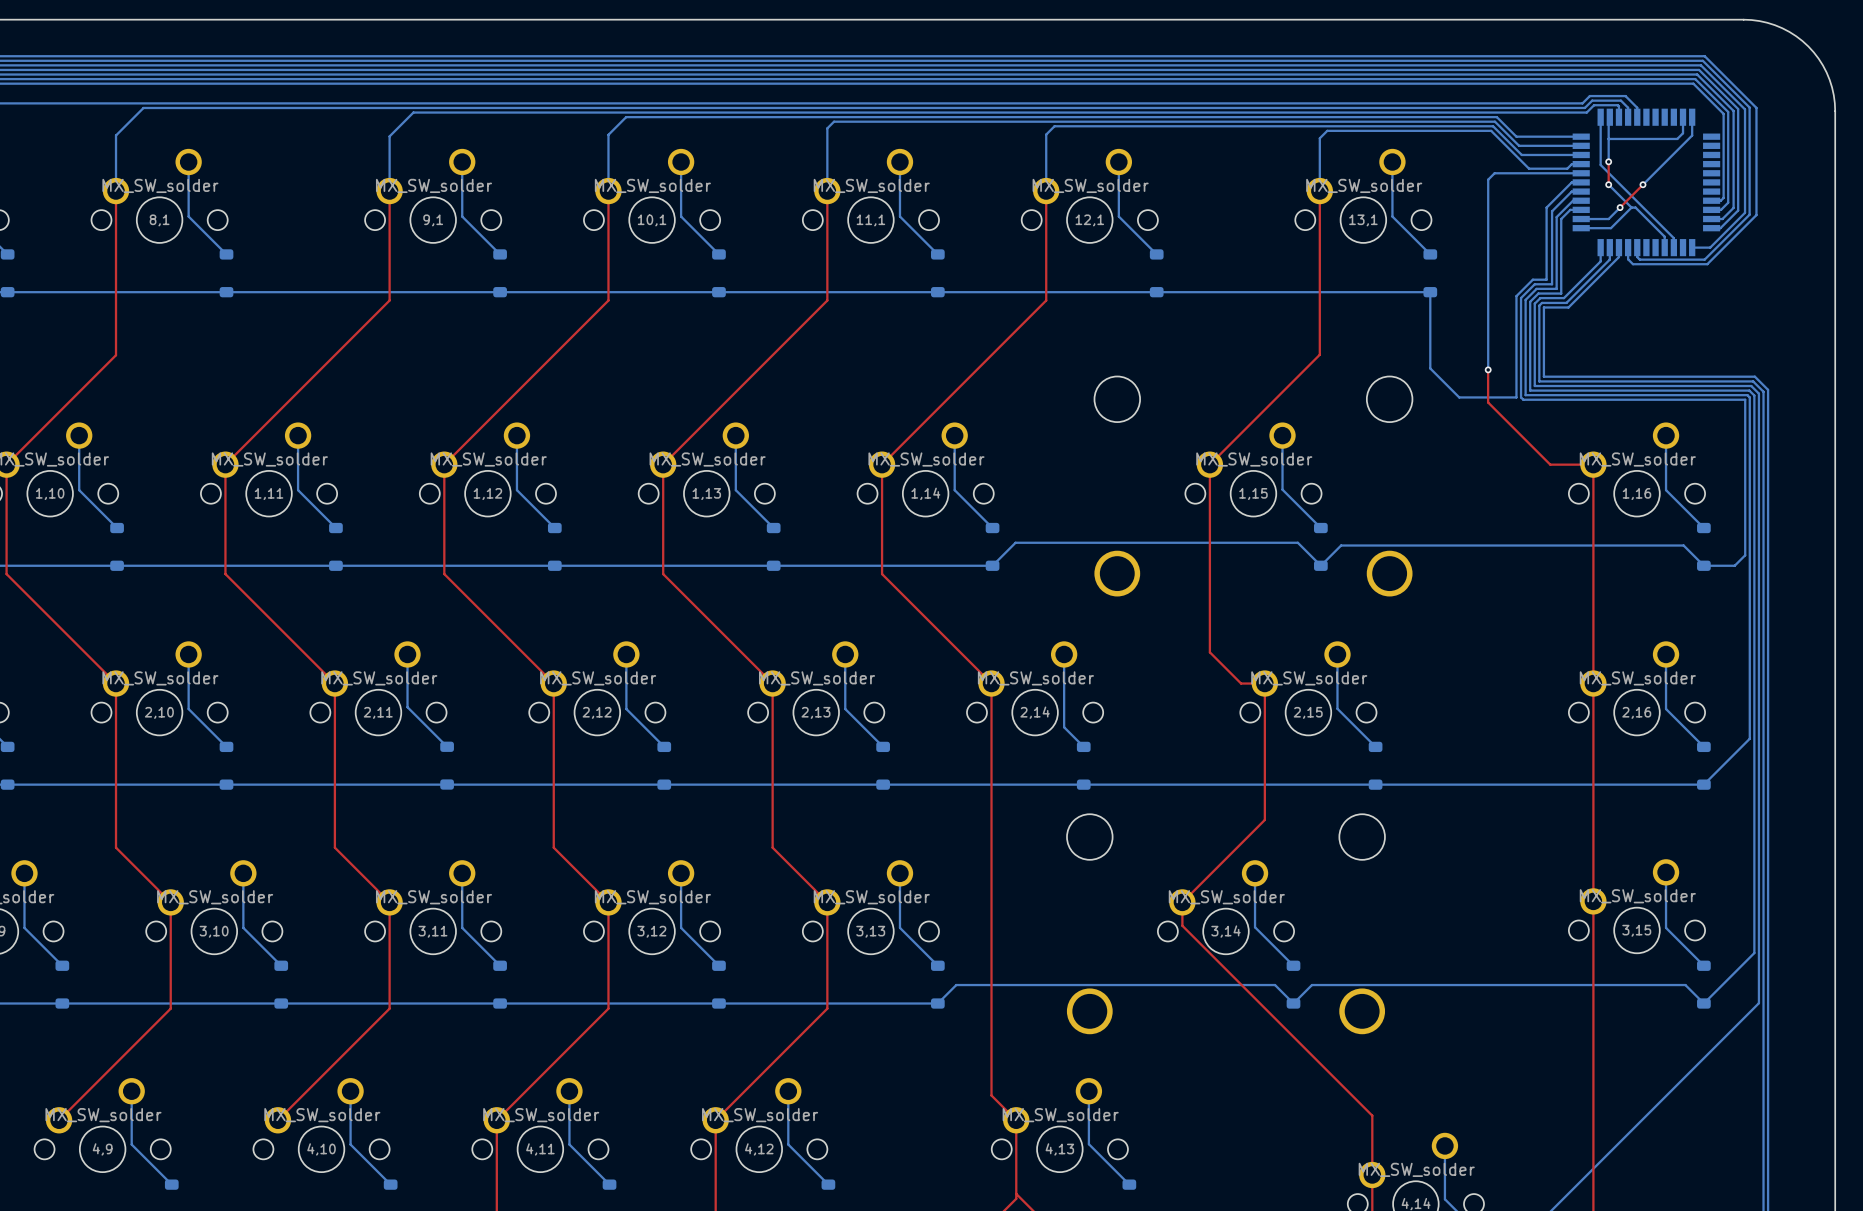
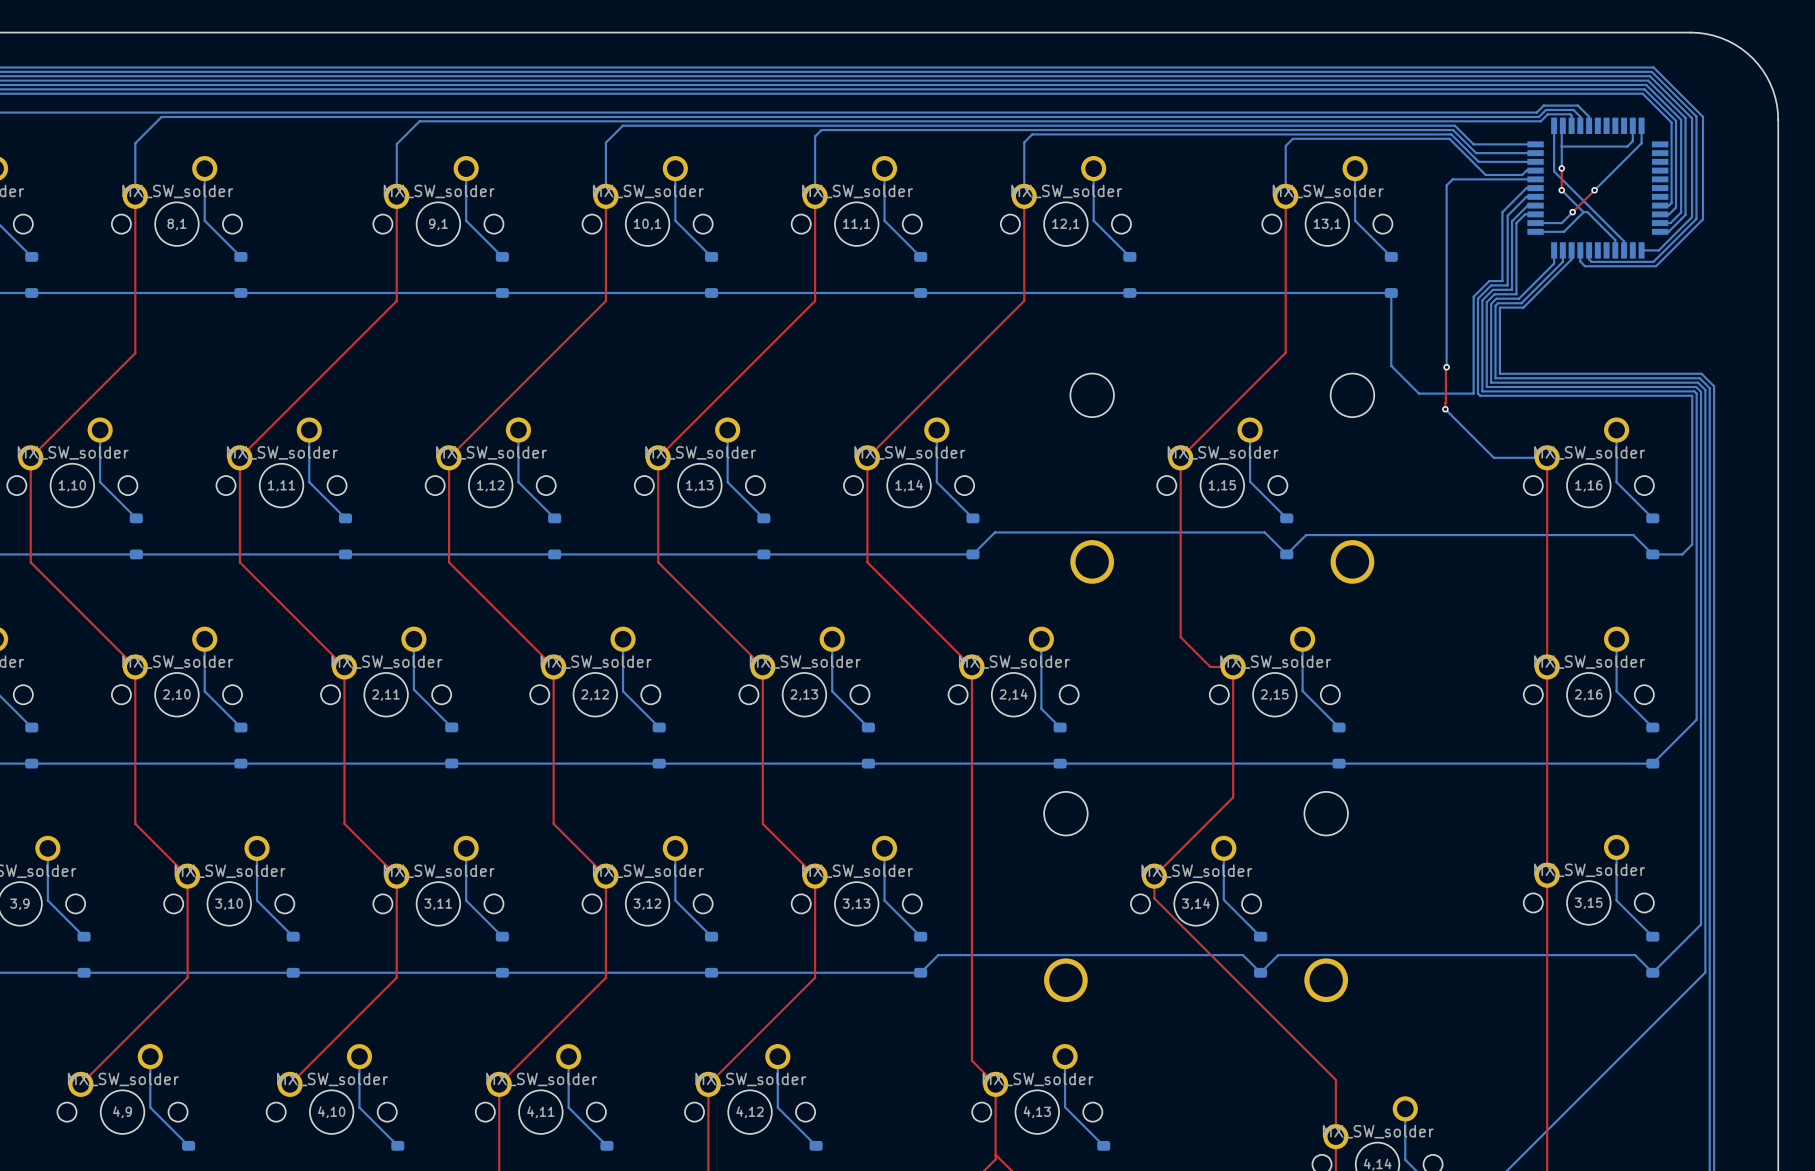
top track: (1488, 369) (1488, 402) (1550, 464) (1593, 464) -> none
top track: none -> (1445, 367) (1445, 409)
bottom track: none -> (1445, 409) (1493, 457) (1547, 457)
via: none -> (1445, 409)

